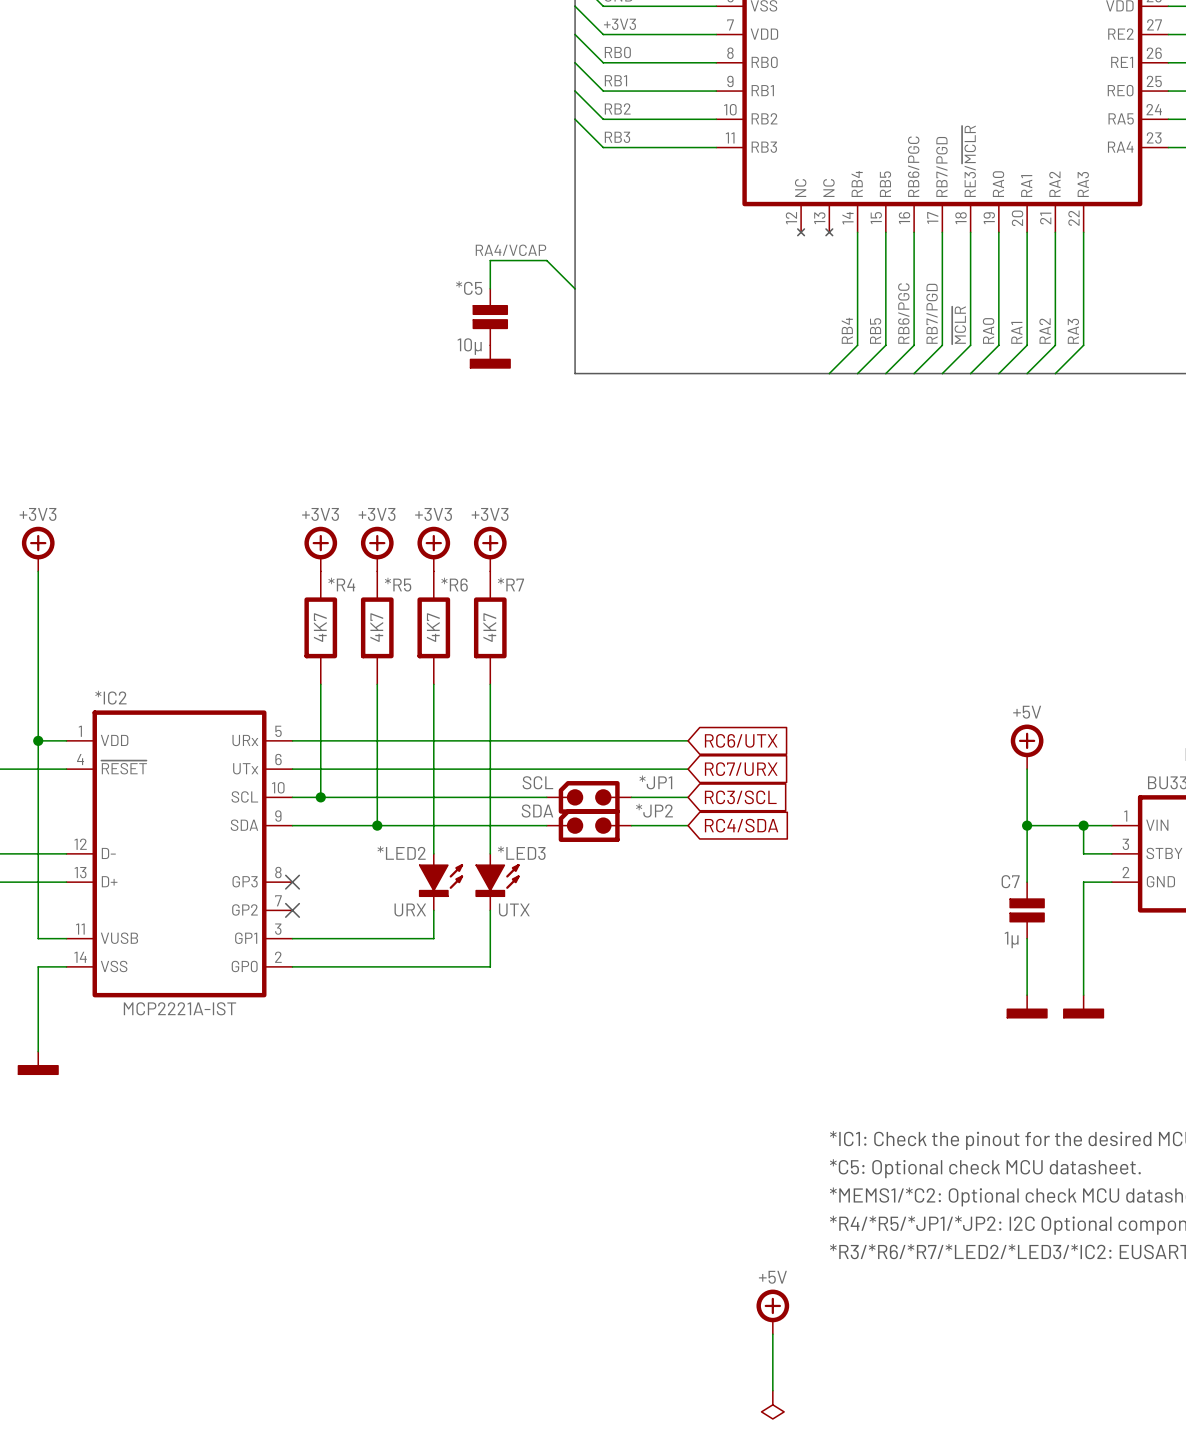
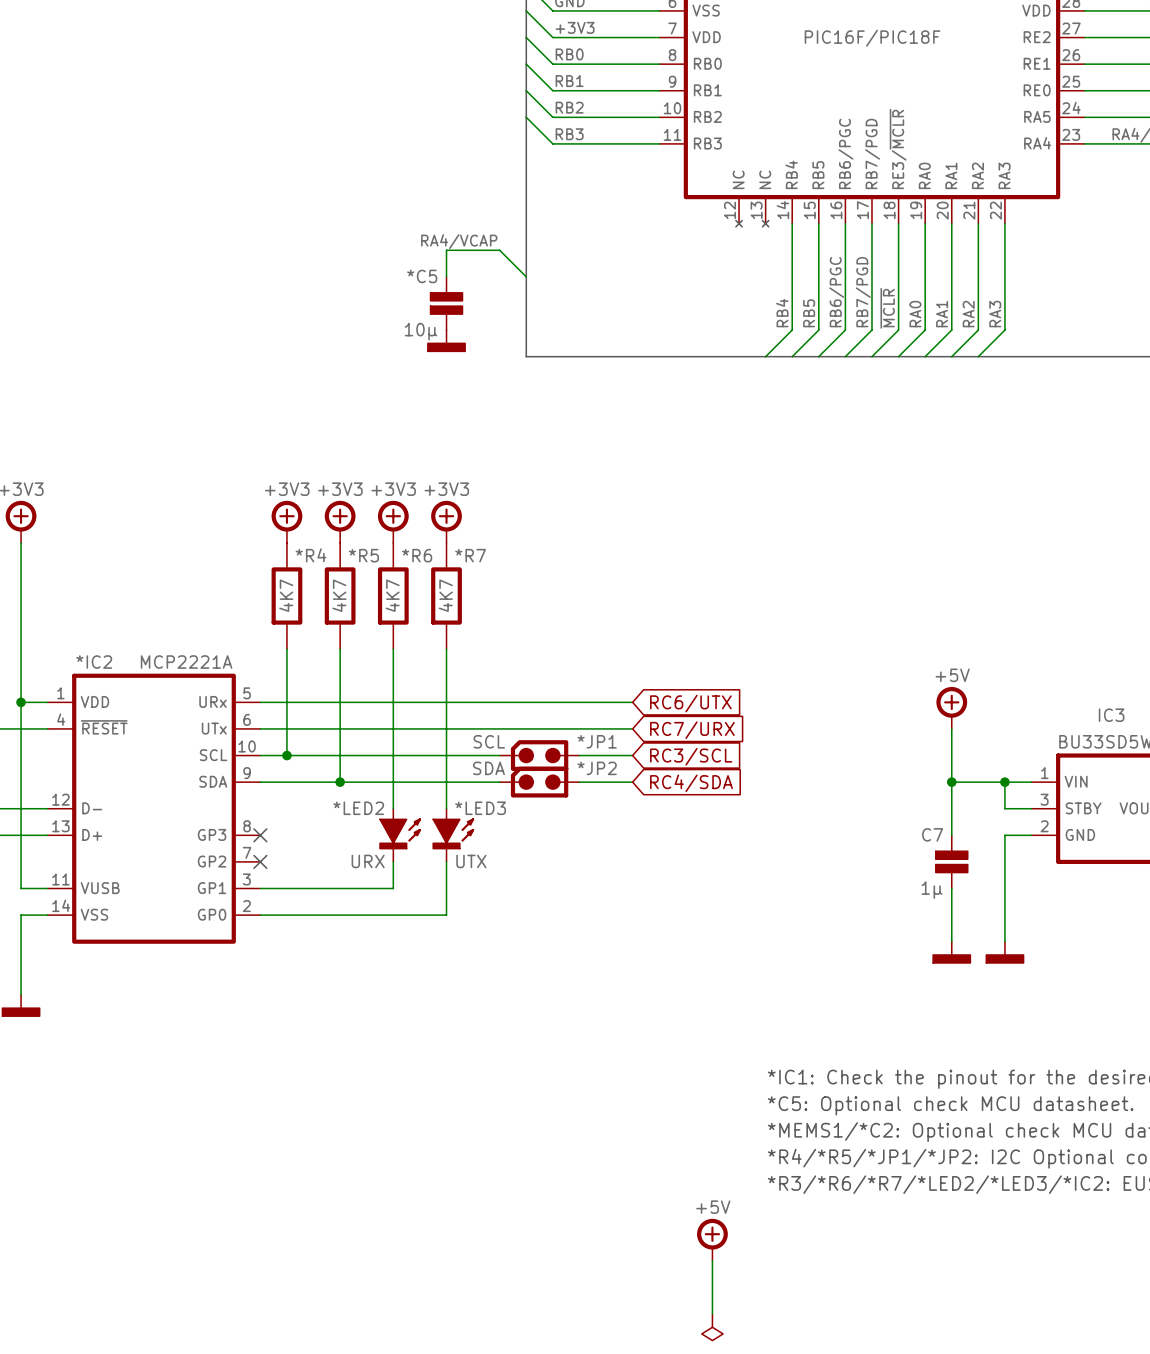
part value: none -> PIC16F/PIC18F (872, 38)
*IC2 value: none -> MCP2221A (186, 662)
*IC2 text: MCP2221A-IST (179, 1008) -> none

